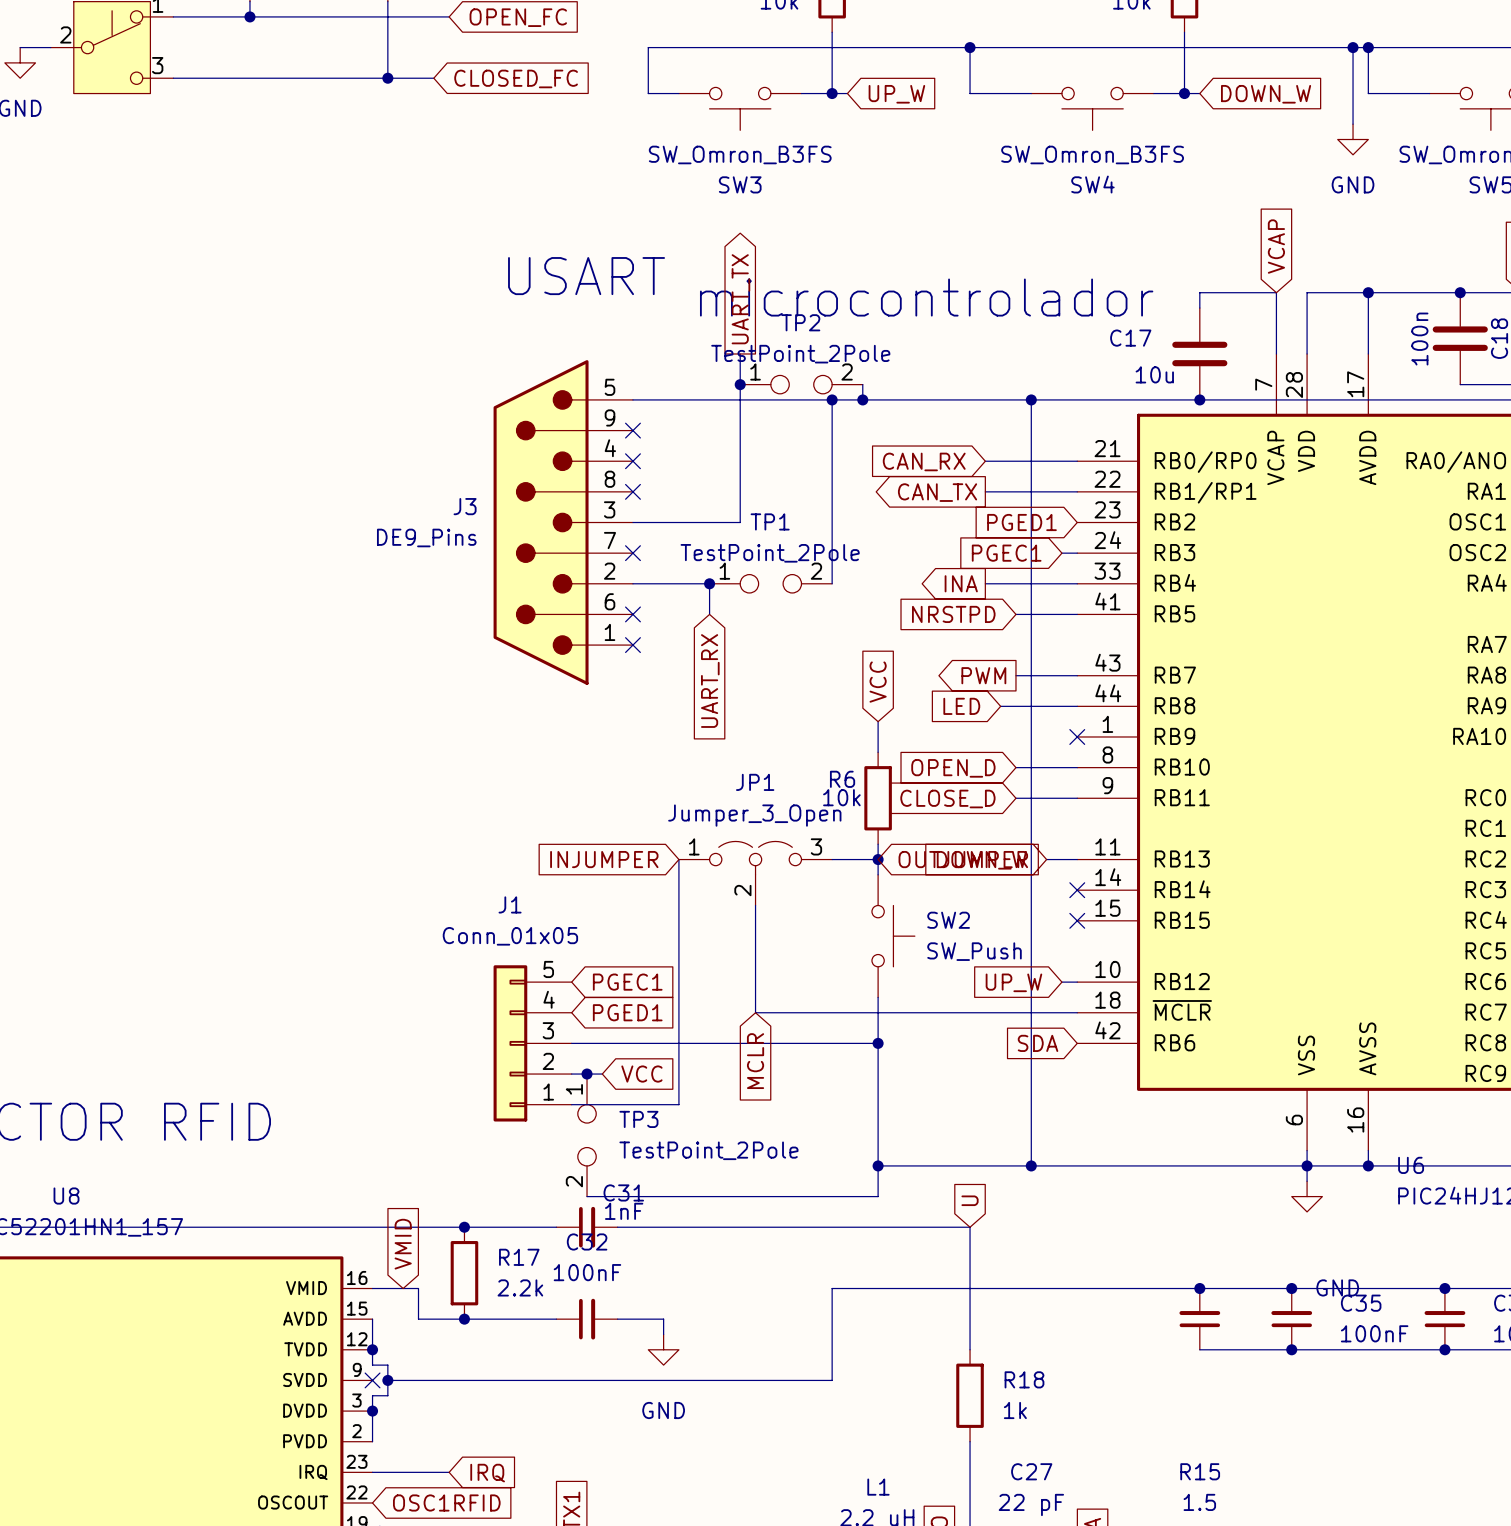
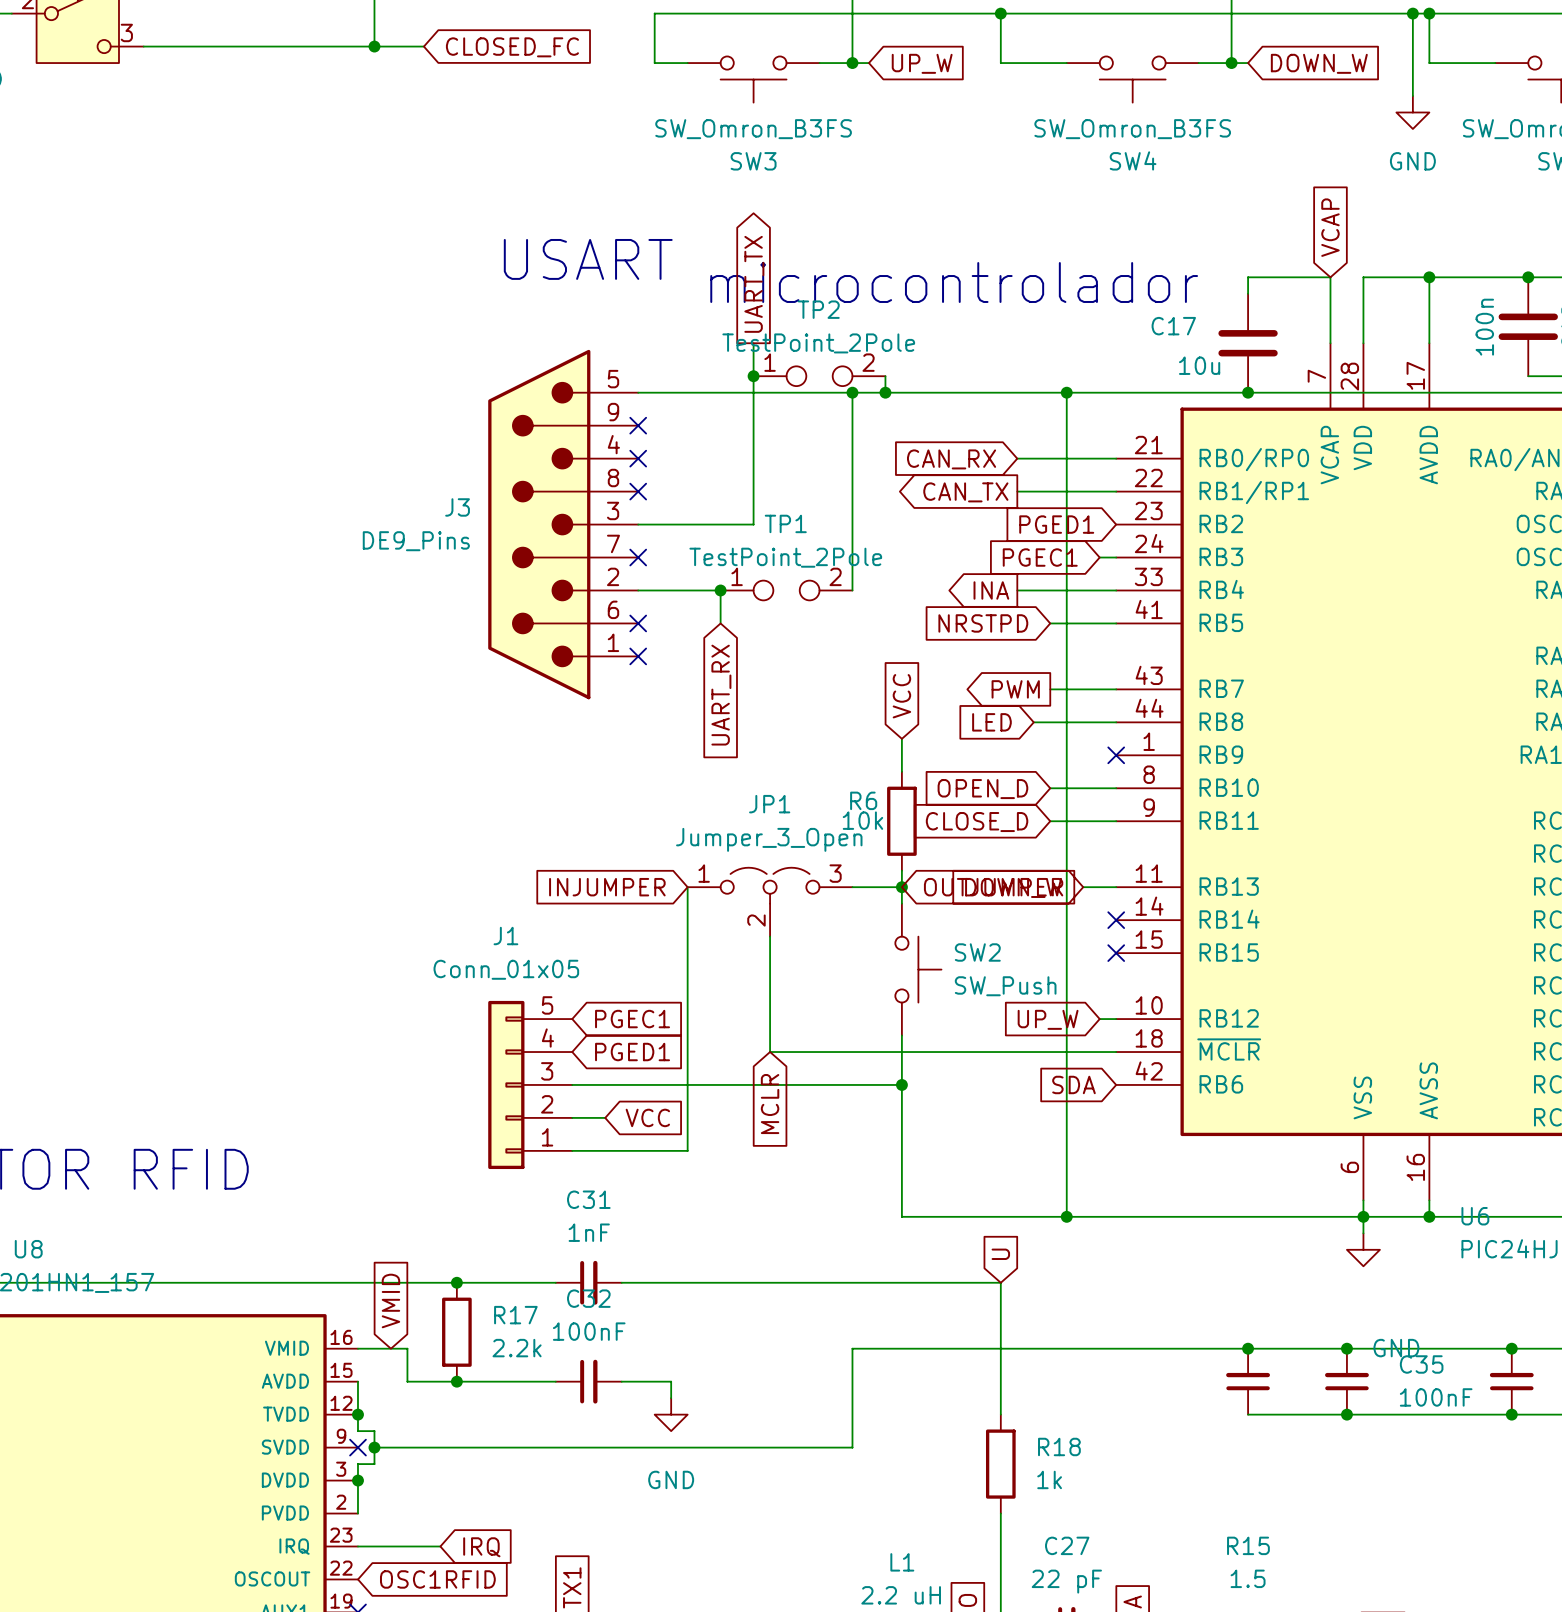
junction: (587, 1074) -> none
TP3: TestPoint_2Pole (587, 1135) -> none
wire: (878, 1165) (878, 1196) (587, 1196) -> none
junction: (878, 1165) -> none
C31 name position: C31 (623, 1192) -> C31 (588, 1199)
C31 value position: 1nF (624, 1211) -> 1nF (589, 1232)

